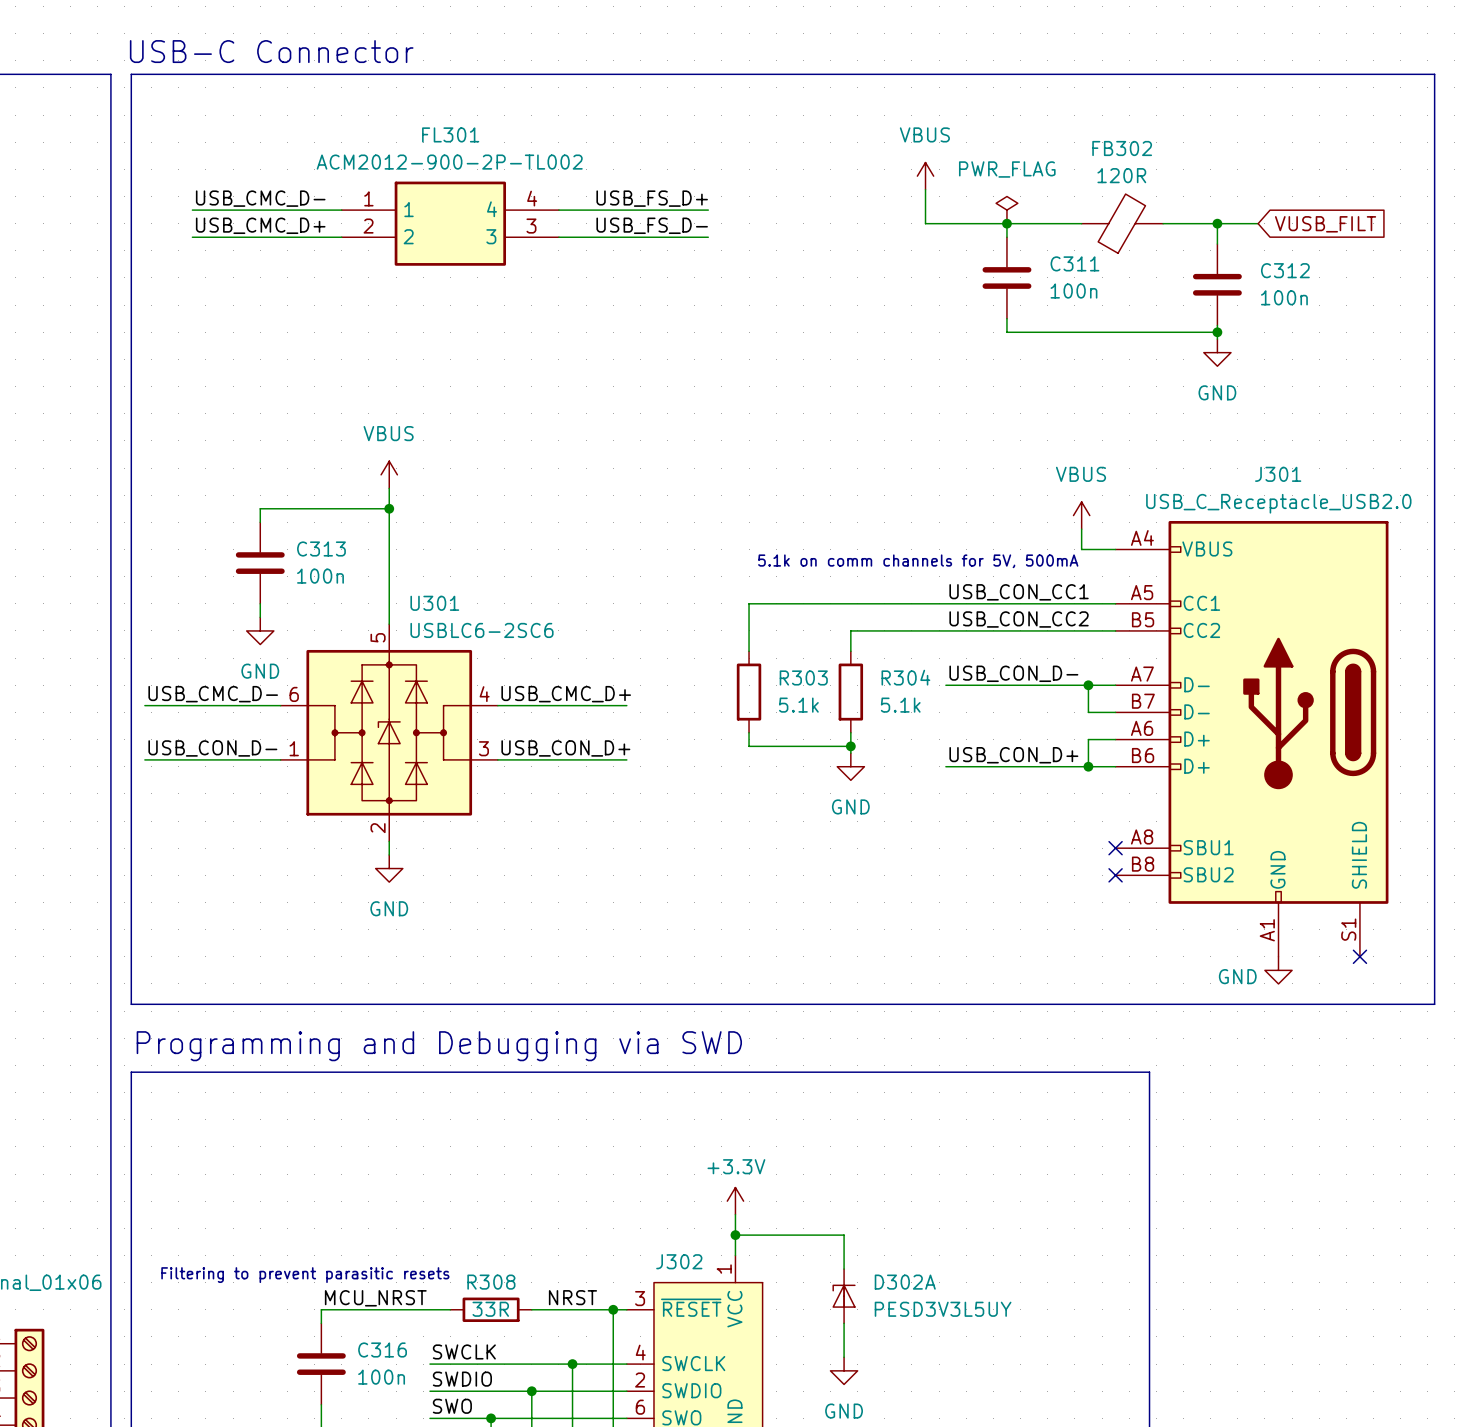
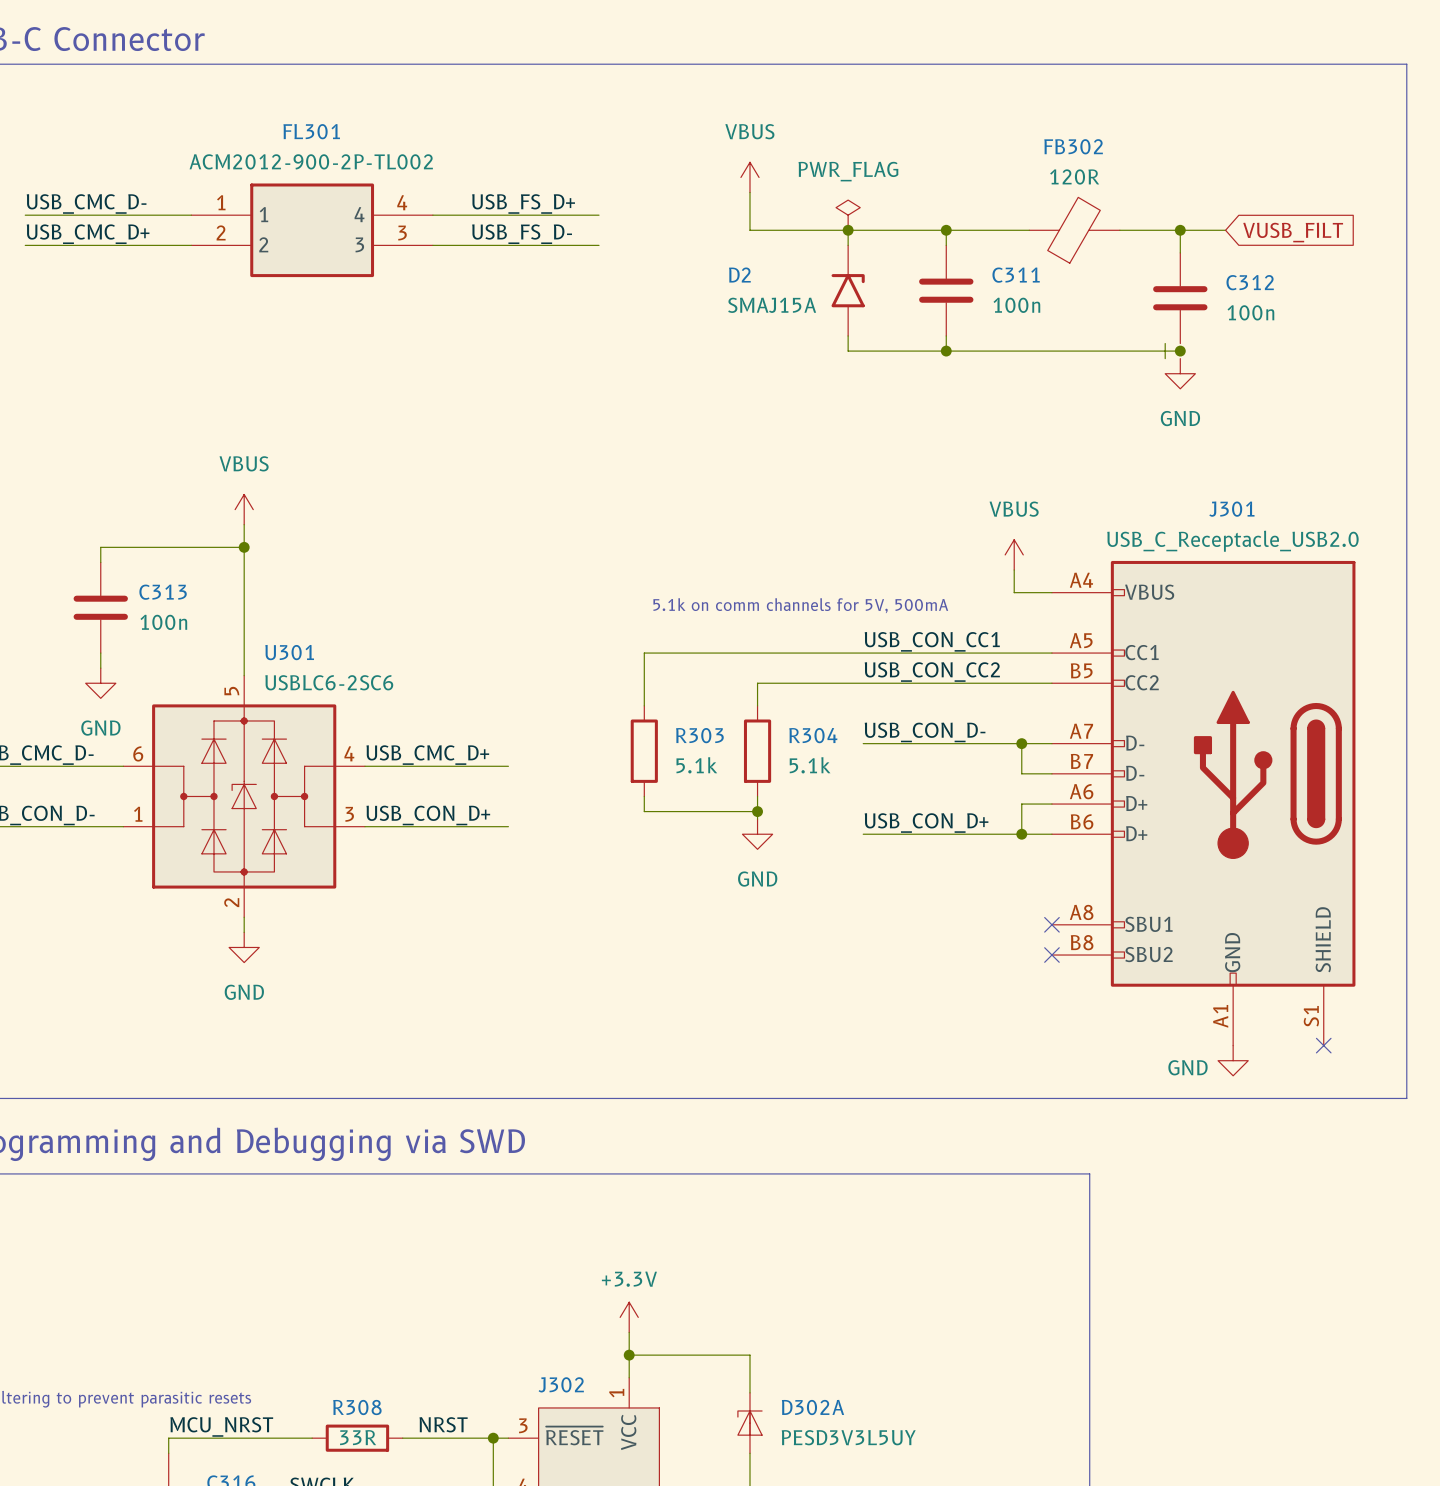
power symbol position: VBUS (925, 176) -> VBUS (749, 177)
wire: (925, 189) (925, 223) -> (749, 192) (749, 230) (840, 230)
power symbol position: PWR_FLAG (1006, 210) -> PWR_FLAG (848, 215)
wire: none -> (848, 230) (848, 245)
junction: none -> (848, 230)
wire: (1006, 223) (1006, 237) -> (946, 230) (946, 245)
junction position: (1006, 223) -> (946, 230)
FB302 position: (1122, 223) -> (1074, 230)
wire: (1217, 223) (1217, 244) -> (1180, 230) (1180, 252)
junction position: (1217, 223) -> (1180, 230)
wire: none -> (1210, 230) (1225, 230)
global label position: VUSB_FILT (1325, 224) -> VUSB_FILT (1293, 232)
D2: none -> SMAJ15A (848, 290)
C311 position: (1006, 277) -> (946, 290)
C312 position: (1217, 284) -> (1180, 298)
wire: (1006, 318) (1006, 332) -> (848, 335) (848, 351) (931, 351)
wire: none -> (946, 335) (946, 351)
junction: none -> (946, 351)
wire: none -> (1165, 351) (1180, 351)
junction position: (1217, 332) -> (1180, 351)
power symbol position: GND (1217, 352) -> GND (1180, 373)

